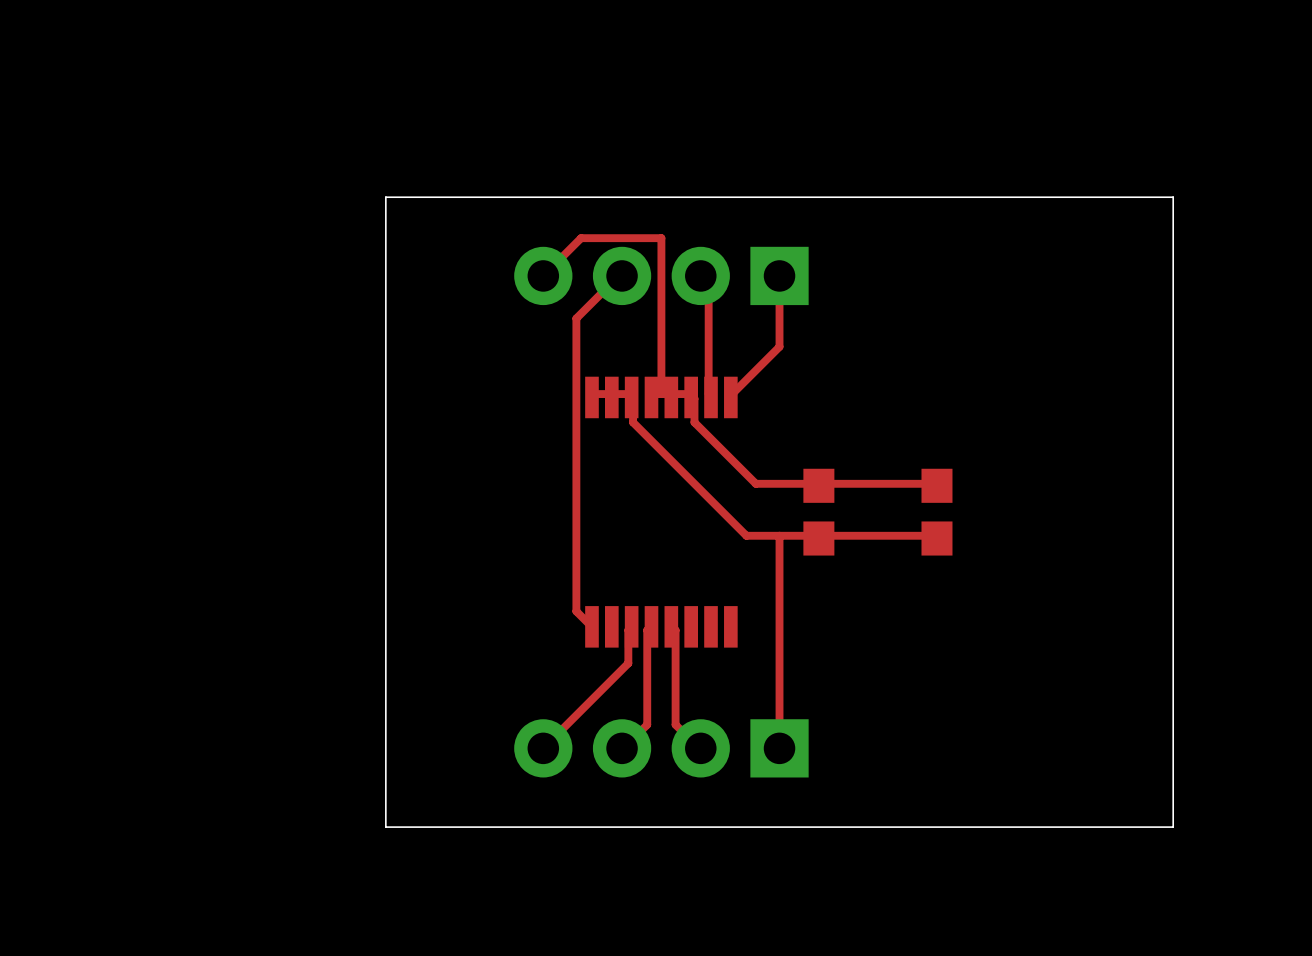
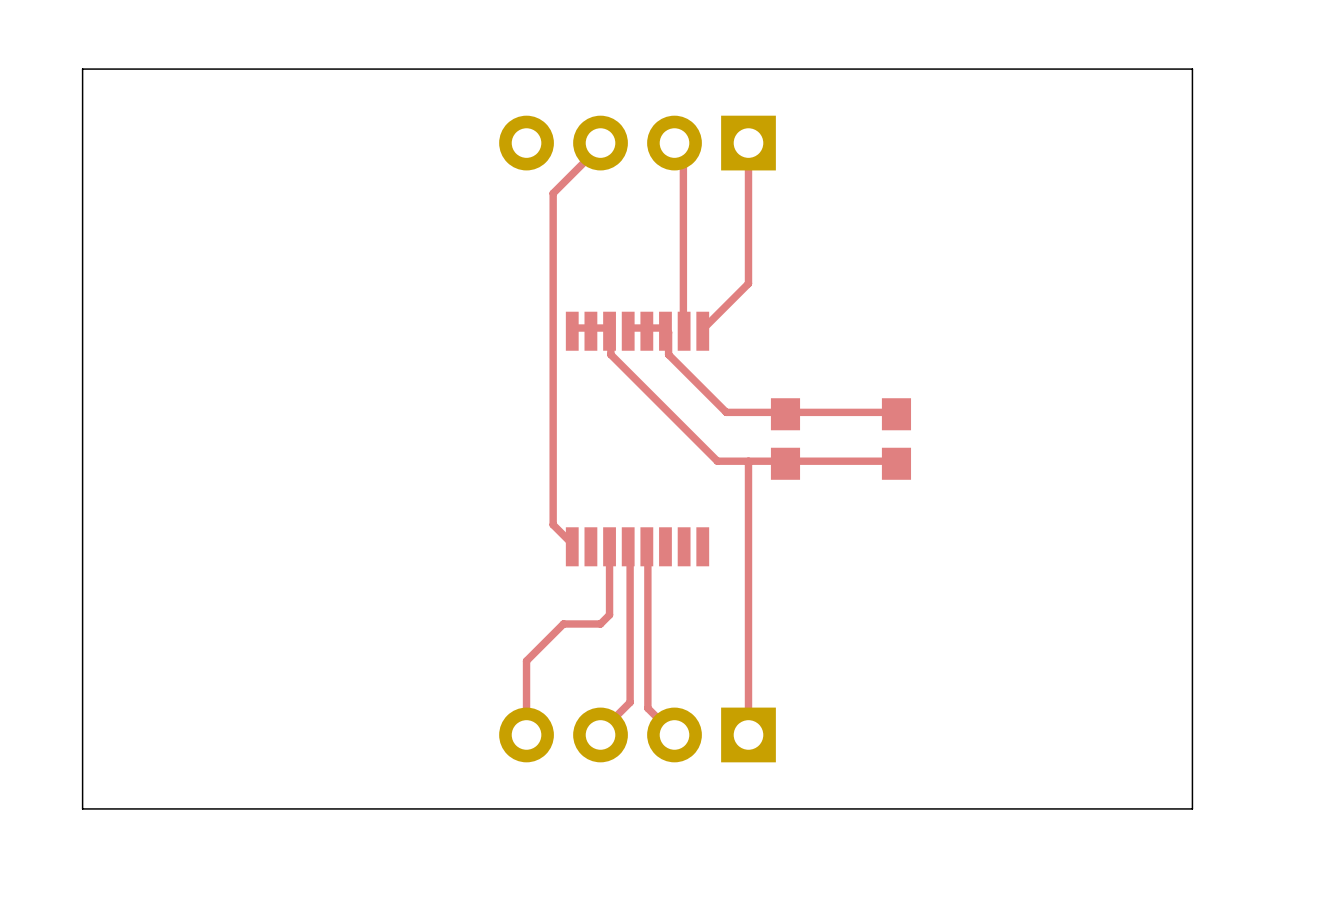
top track: none -> (748, 143) (748, 217)
board edge: (1173, 197) (385, 197) (385, 827) (1173, 827) (1173, 197) -> (1192, 69) (1192, 808) (82, 808) (82, 69) (1192, 69)
top track: (543, 275) (581, 238) (661, 238) (661, 394) -> none
top track: (622, 275) (618, 275) (576, 318) (576, 611) (591, 626) -> (600, 143) (600, 146) (553, 193) (553, 524) (570, 542) (572, 546)
part position: (661, 275) -> (637, 143)
top track: (700, 275) (703, 275) (708, 280) (708, 394) (711, 397) -> (674, 143) (683, 151) (684, 331)
top track: (631, 626) (628, 630) (628, 663) (582, 708) -> (609, 546) (609, 614) (600, 623) (563, 623)
top track: (651, 626) (647, 630) (647, 724) (622, 748) -> (628, 546) (630, 548) (630, 702) (600, 732) (600, 734)
top track: (671, 626) (675, 630) (675, 724) (700, 748) -> (646, 546) (647, 708) (674, 734)
top track: none -> (526, 660) (526, 734)
part position: (661, 748) -> (637, 734)
top track: none -> (748, 660) (748, 734)

